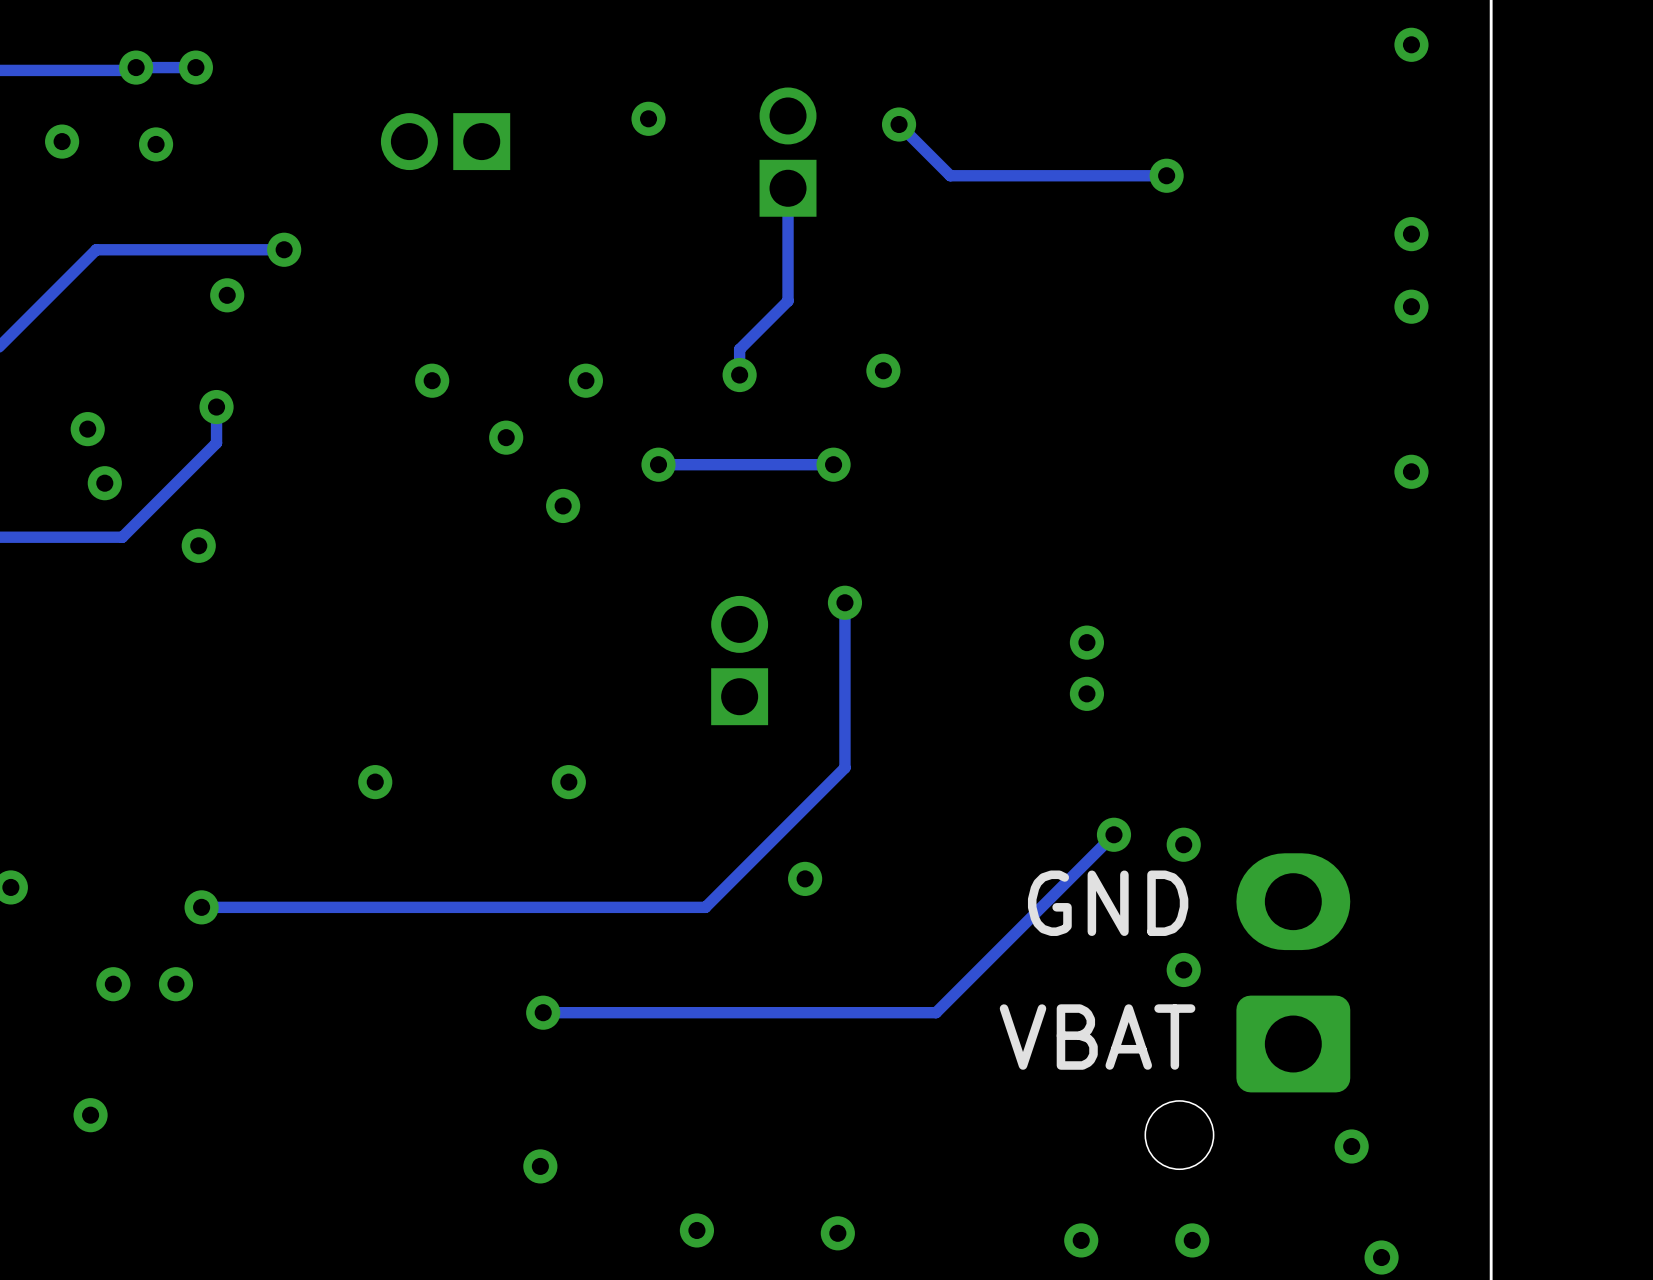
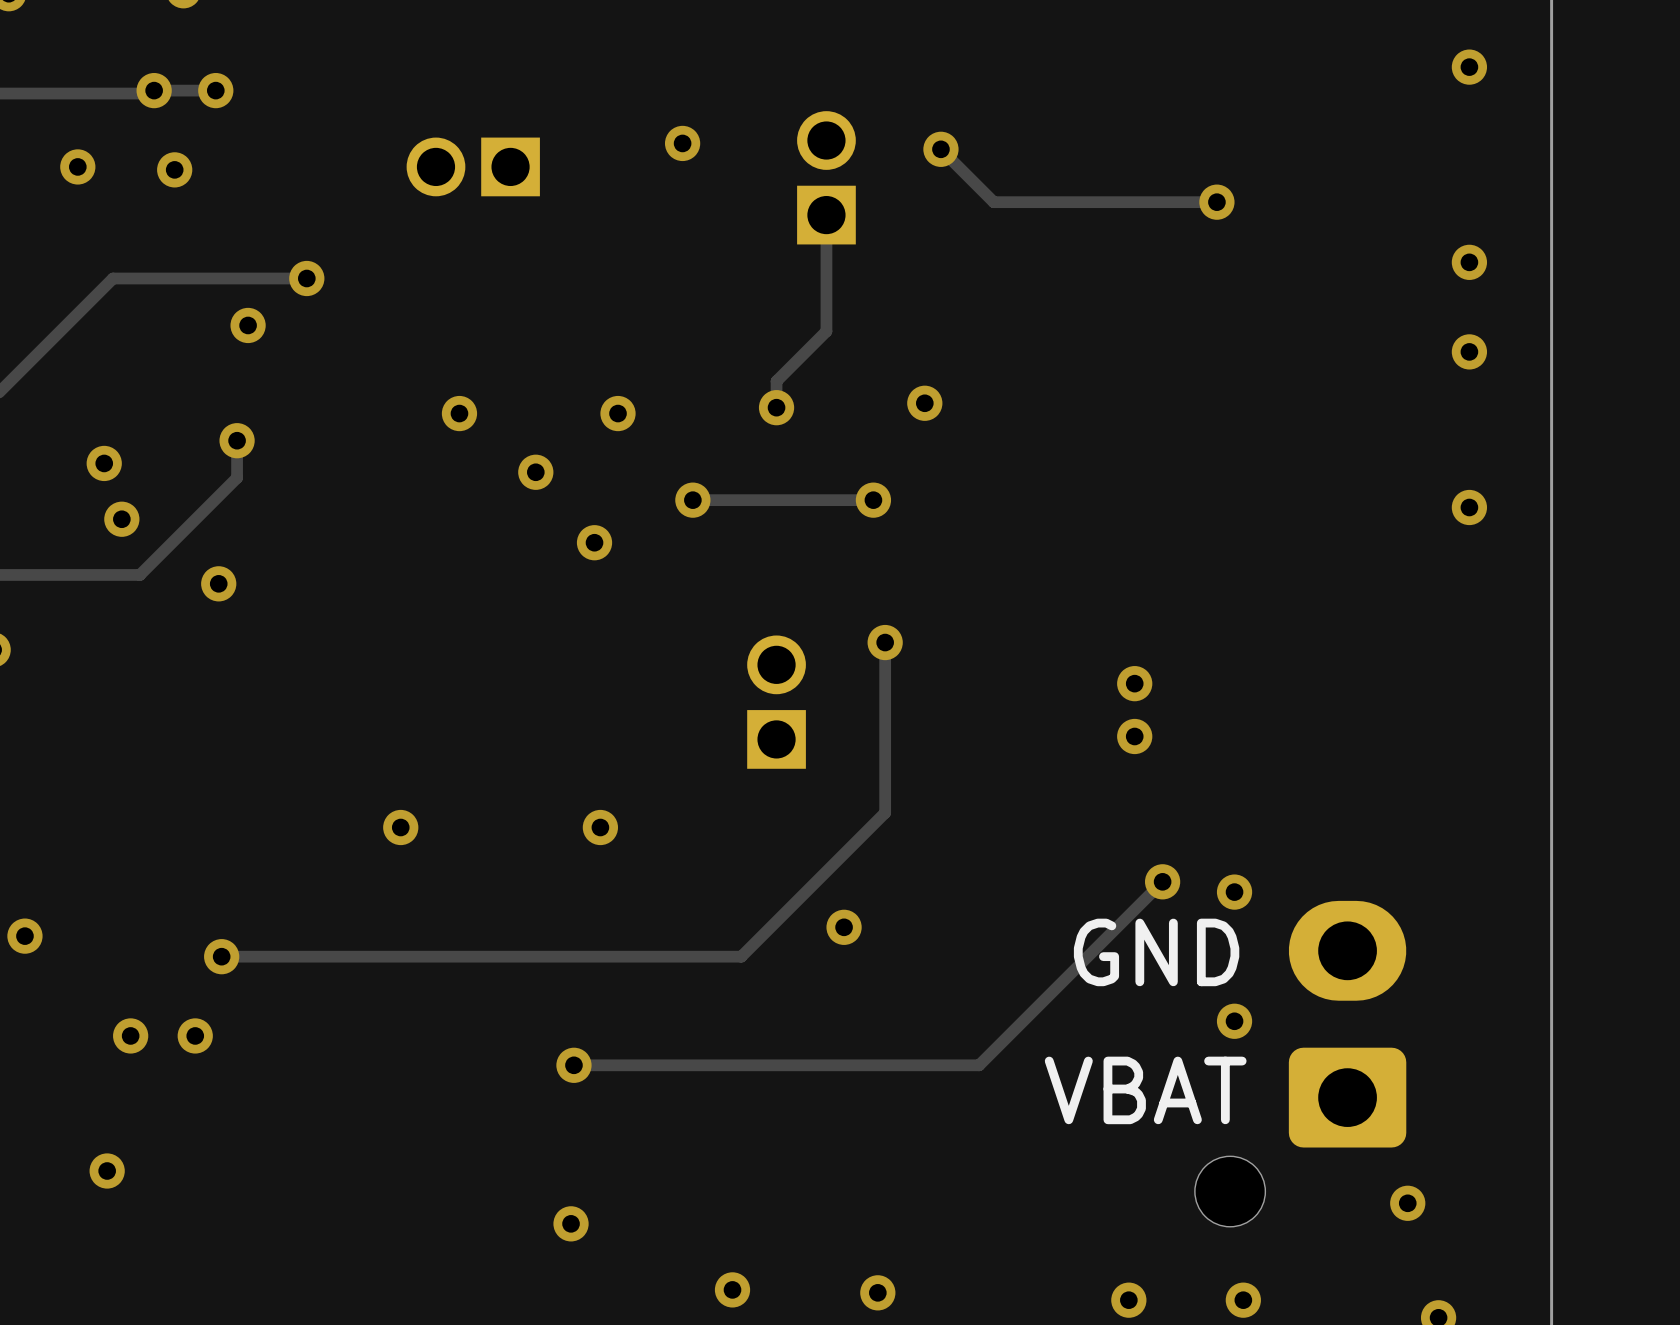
via position: (1411, 306) -> (1469, 351)

